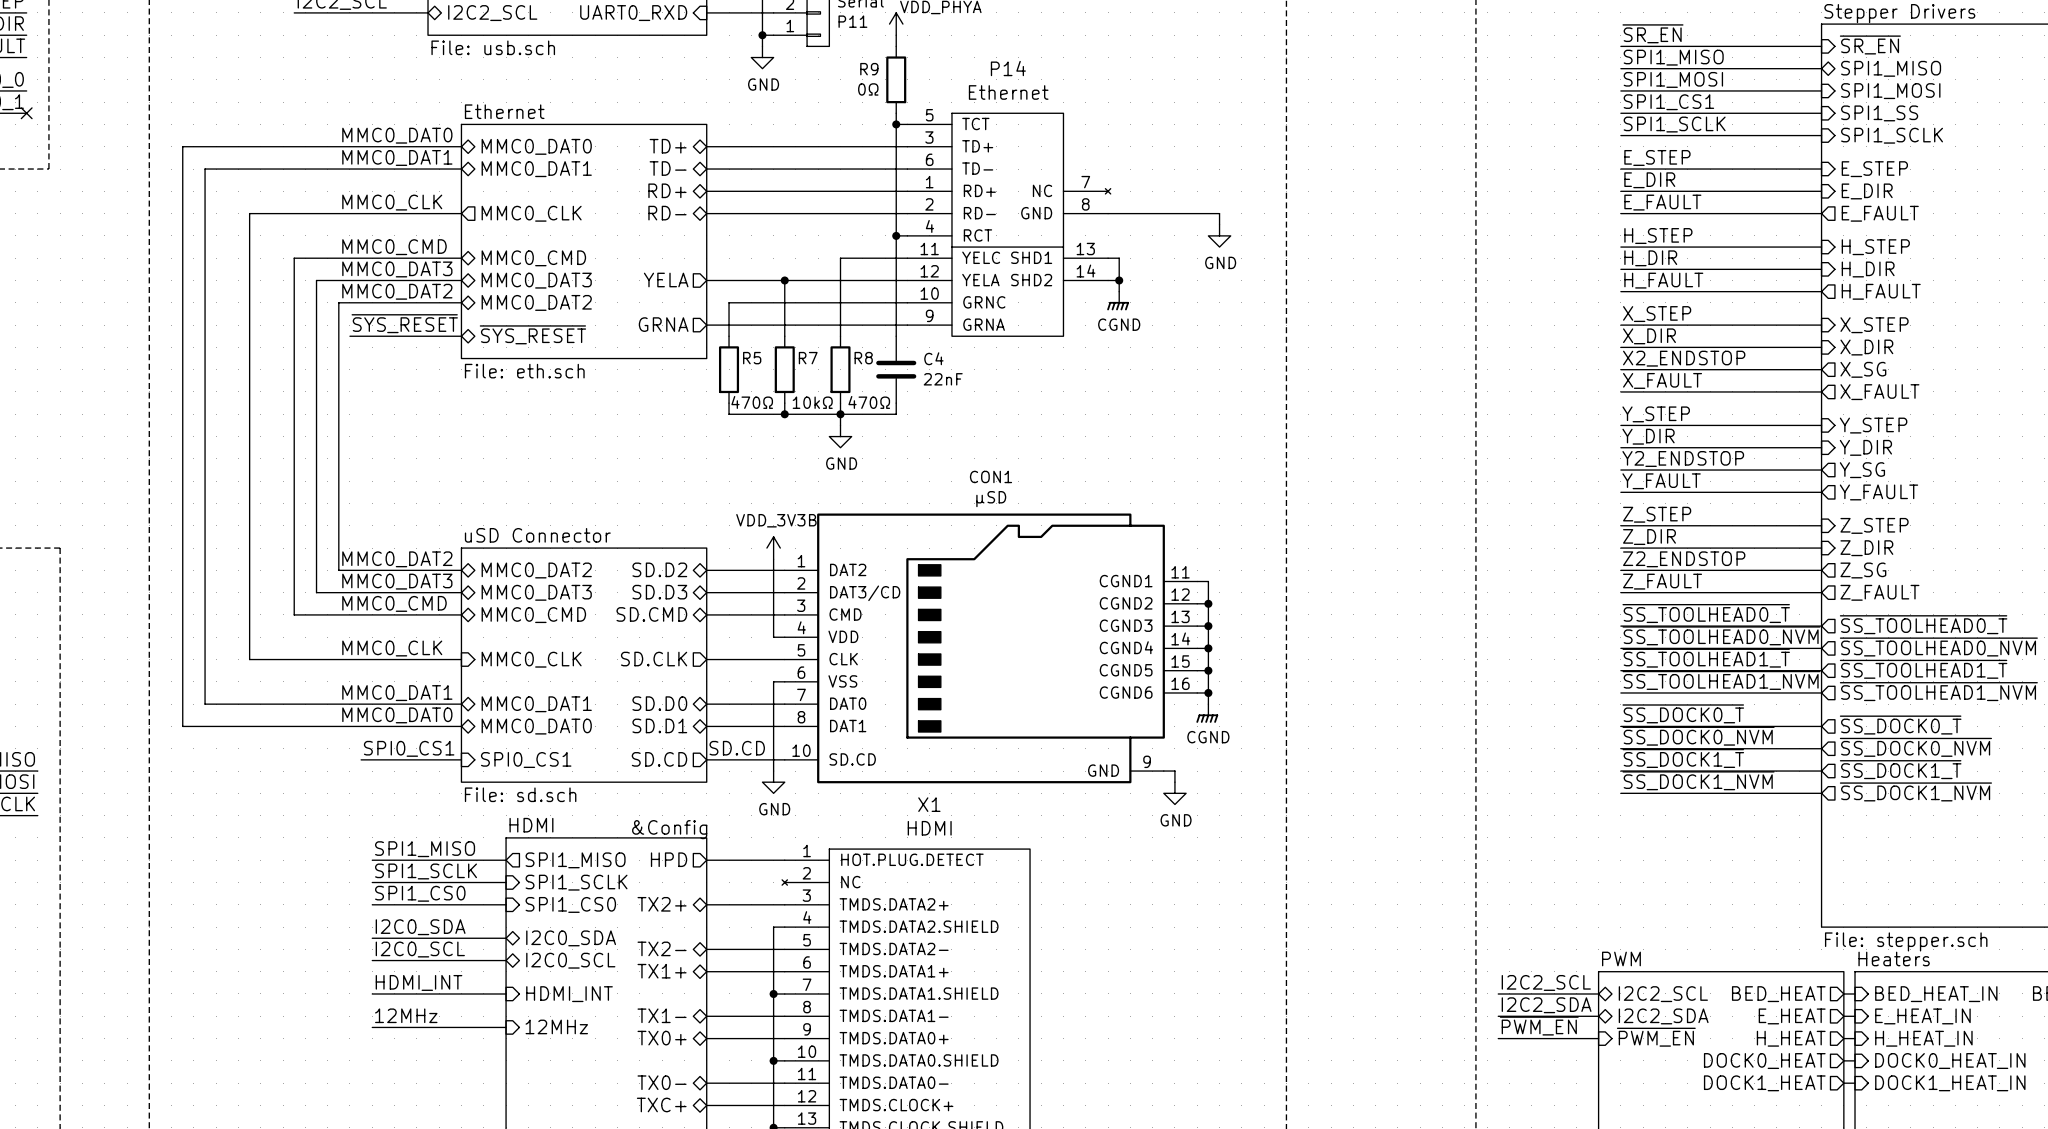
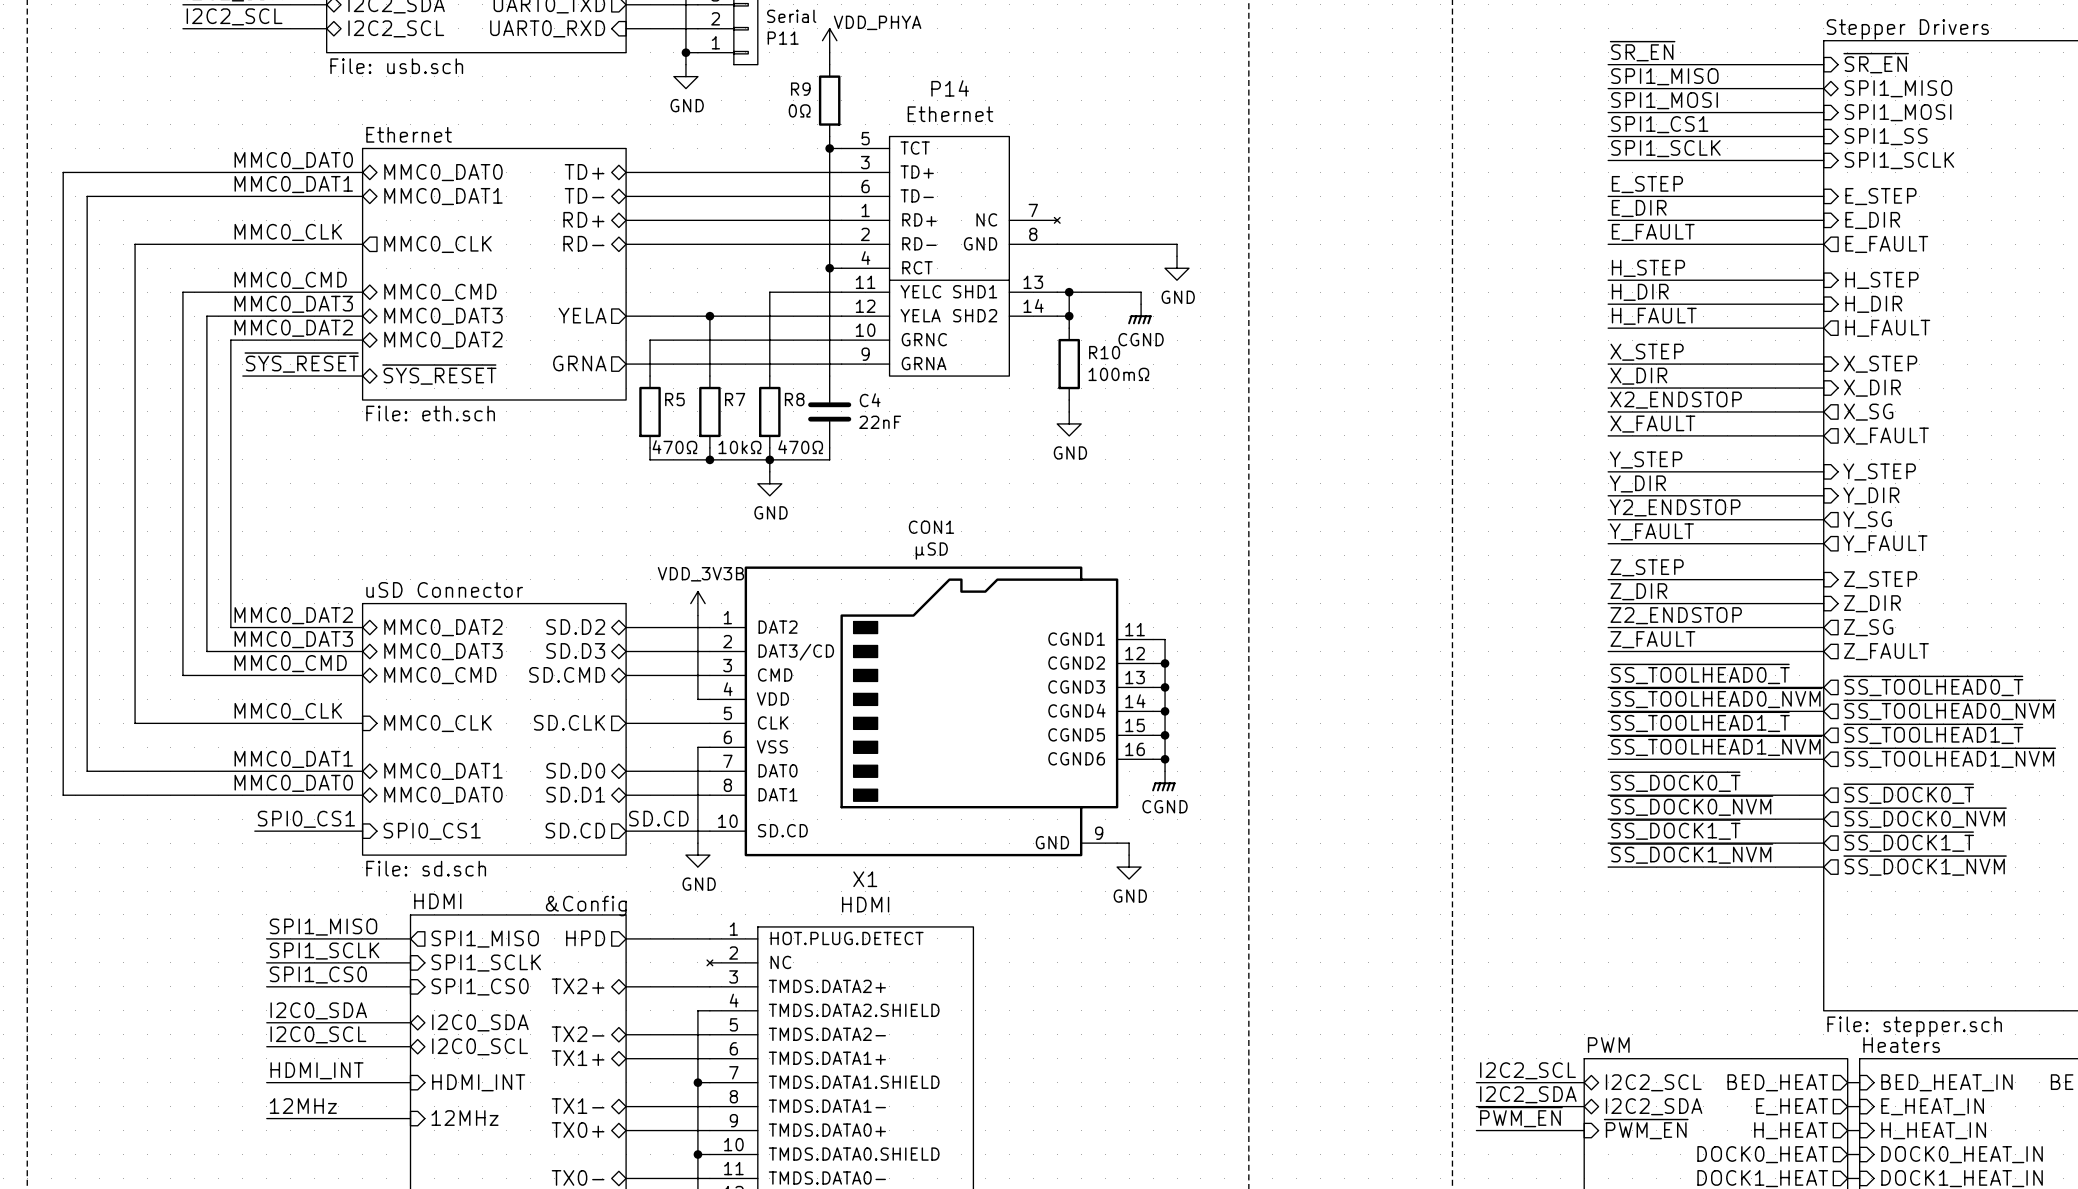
wire: none -> (1069, 292) (1141, 292) (1141, 304)
junction: none -> (1069, 292)
power symbol position: CGND (1118, 301) -> CGND (1139, 314)
R10: none -> 100mΩ (1069, 364)
wire: none -> (1069, 399) (1069, 411)
power symbol: none -> GND (1069, 423)

